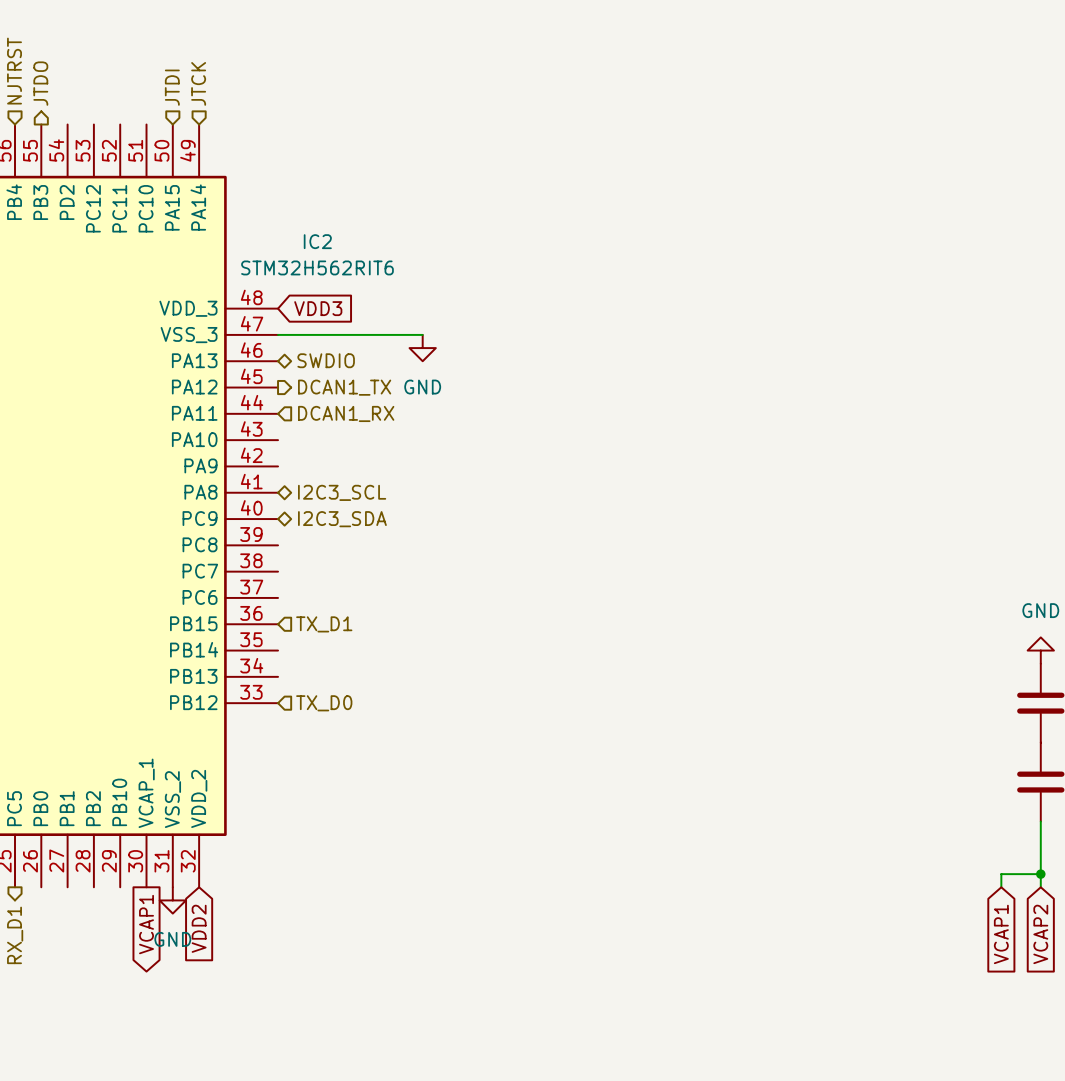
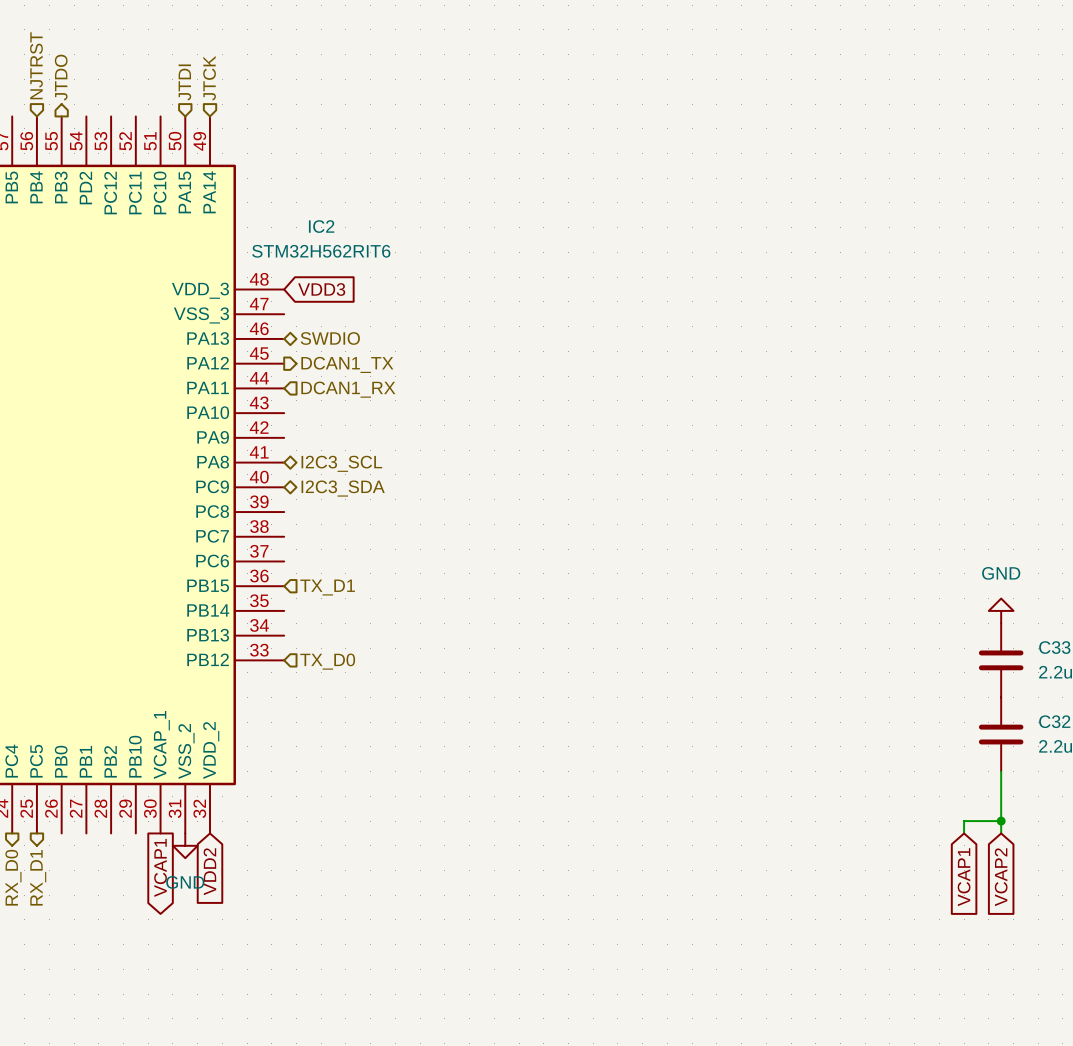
wire: (278, 334) (422, 334) -> none
power symbol: GND (422, 348) -> none

